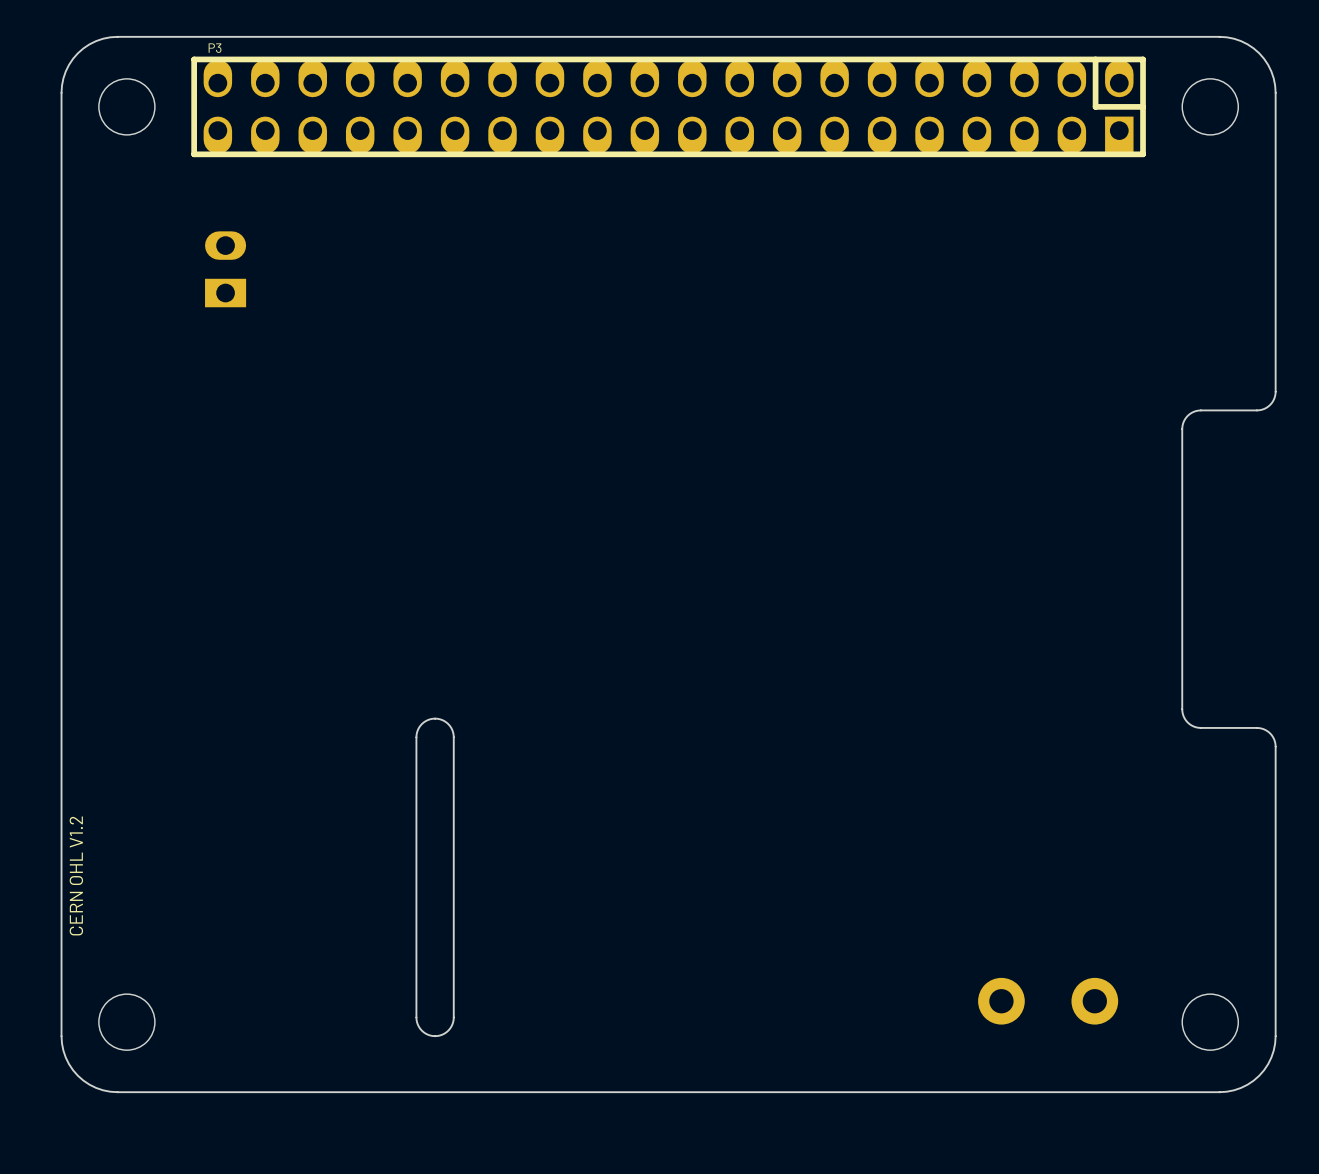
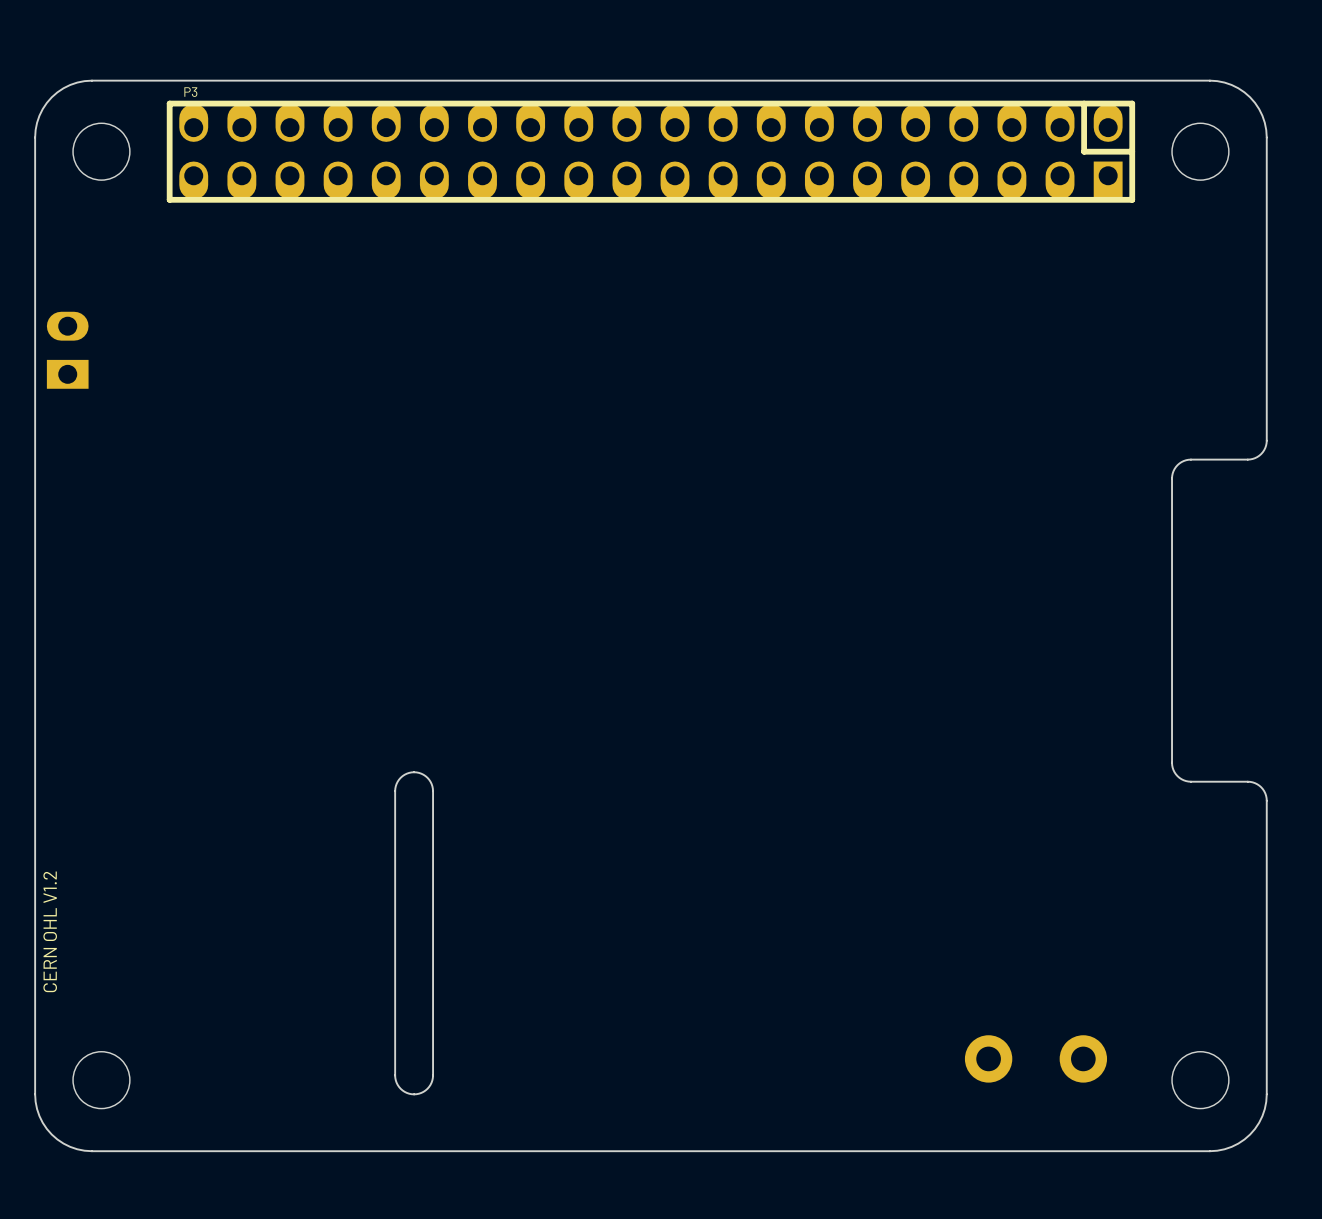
part position: (225, 269) -> (67, 350)

